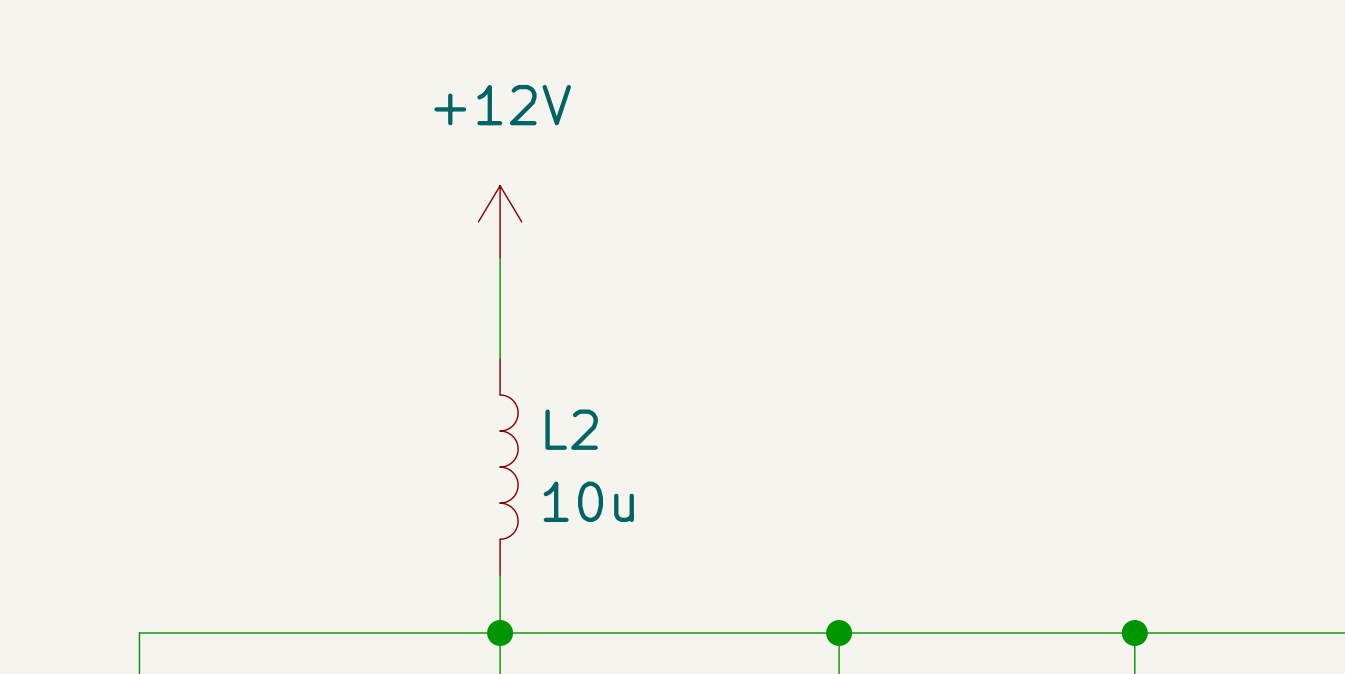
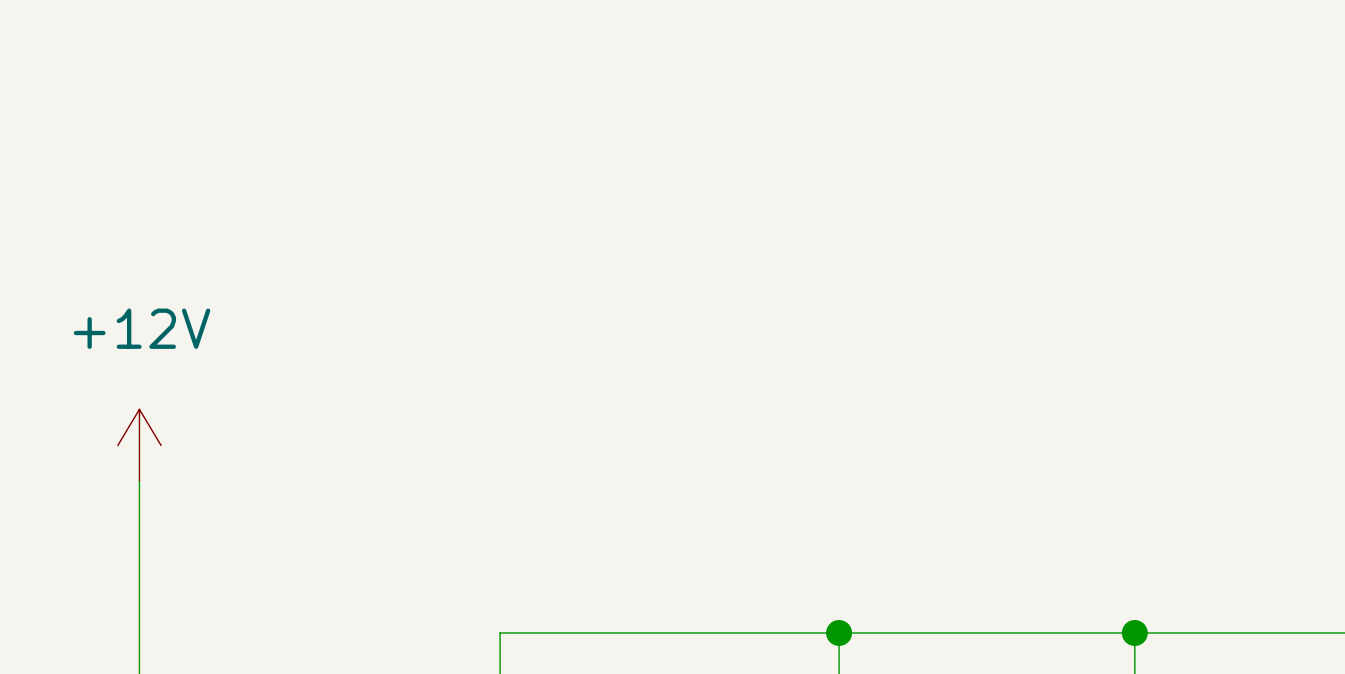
power symbol position: +12V (500, 221) -> +12V (139, 445)
wire: (500, 257) (500, 358) -> none
L2: 10u (509, 467) -> none
wire: (500, 575) (500, 632) (139, 632) -> (139, 481) (139, 632)
junction: (500, 632) -> none

